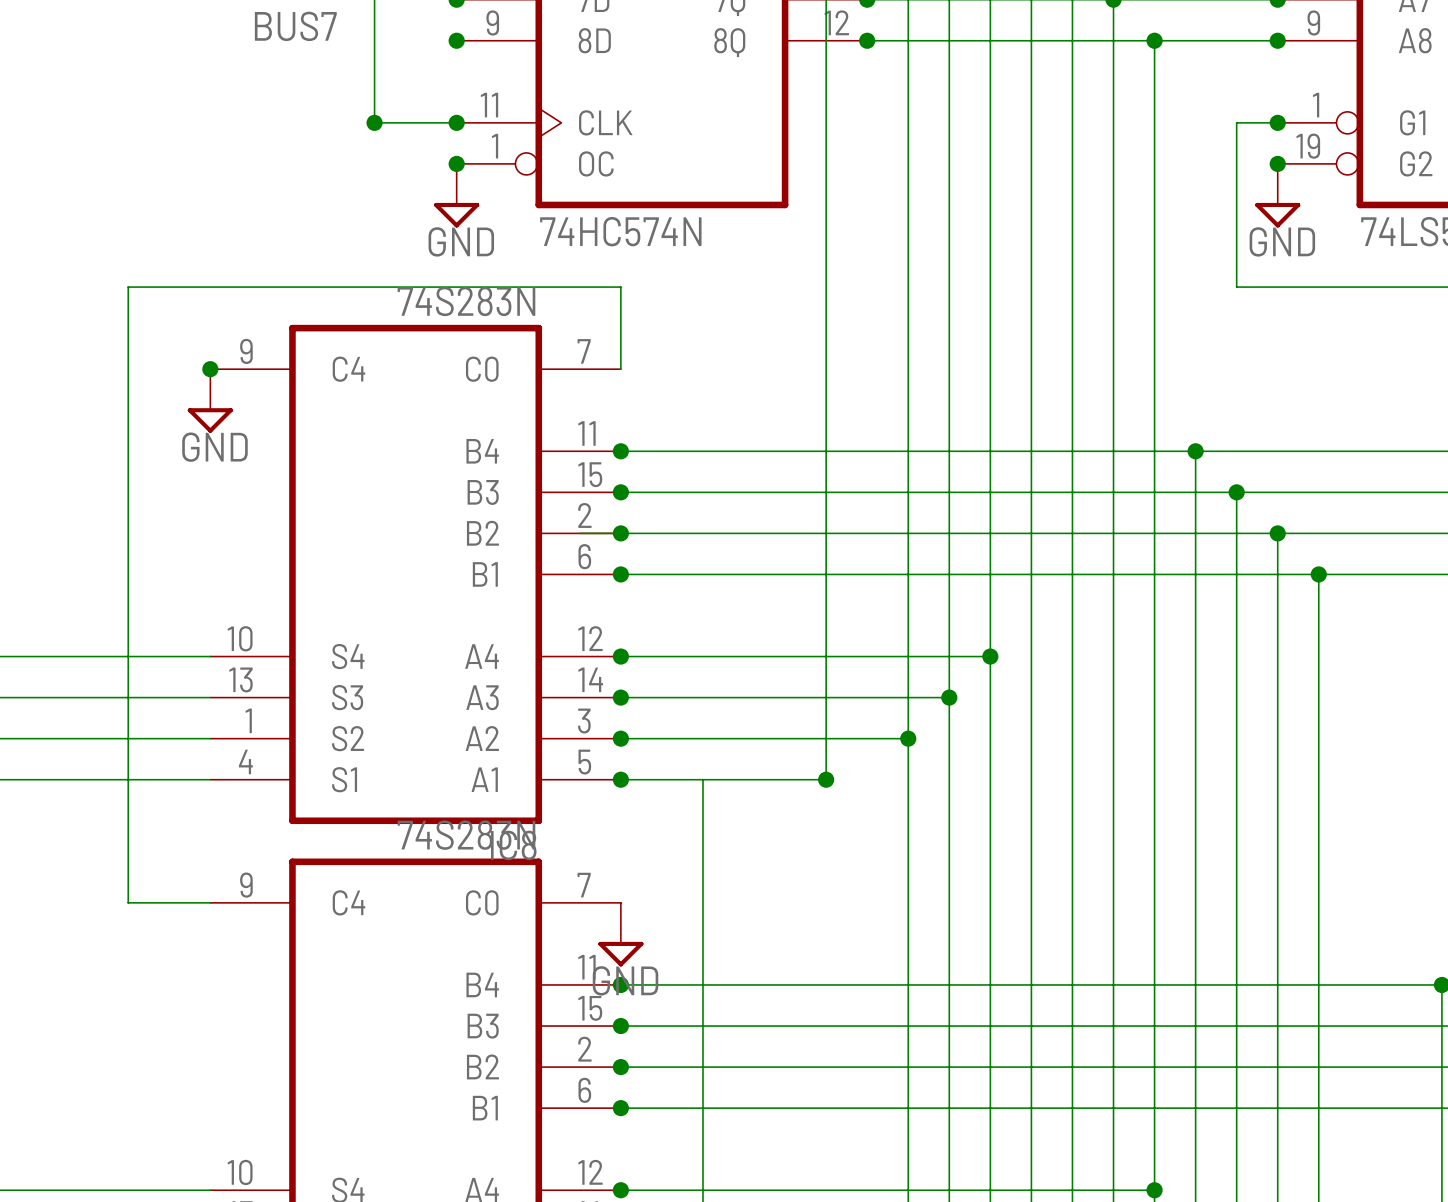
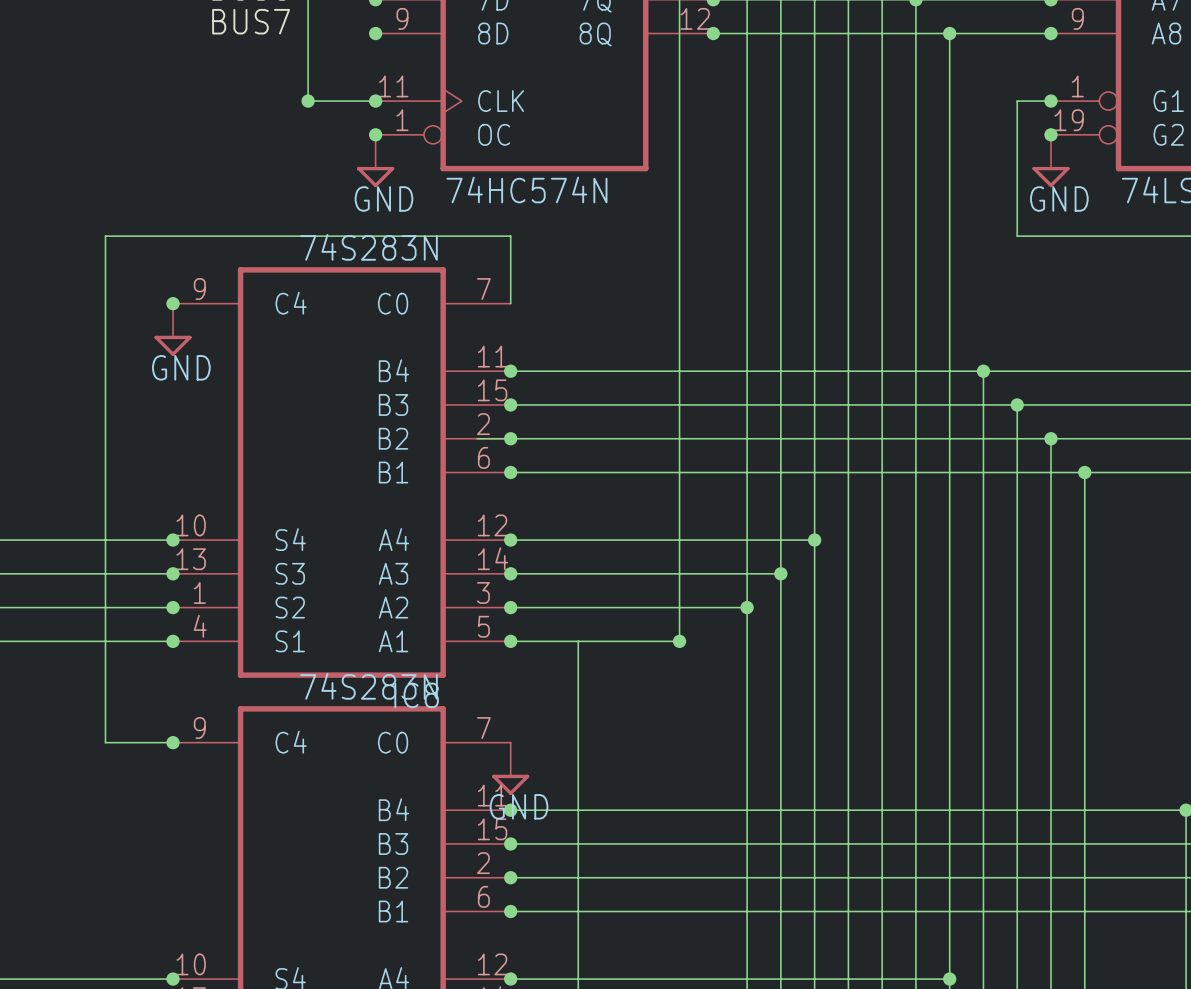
junction: none -> (173, 540)
junction: none -> (173, 573)
junction: none -> (173, 607)
junction: none -> (173, 641)
junction: none -> (173, 742)
junction: none -> (173, 979)

